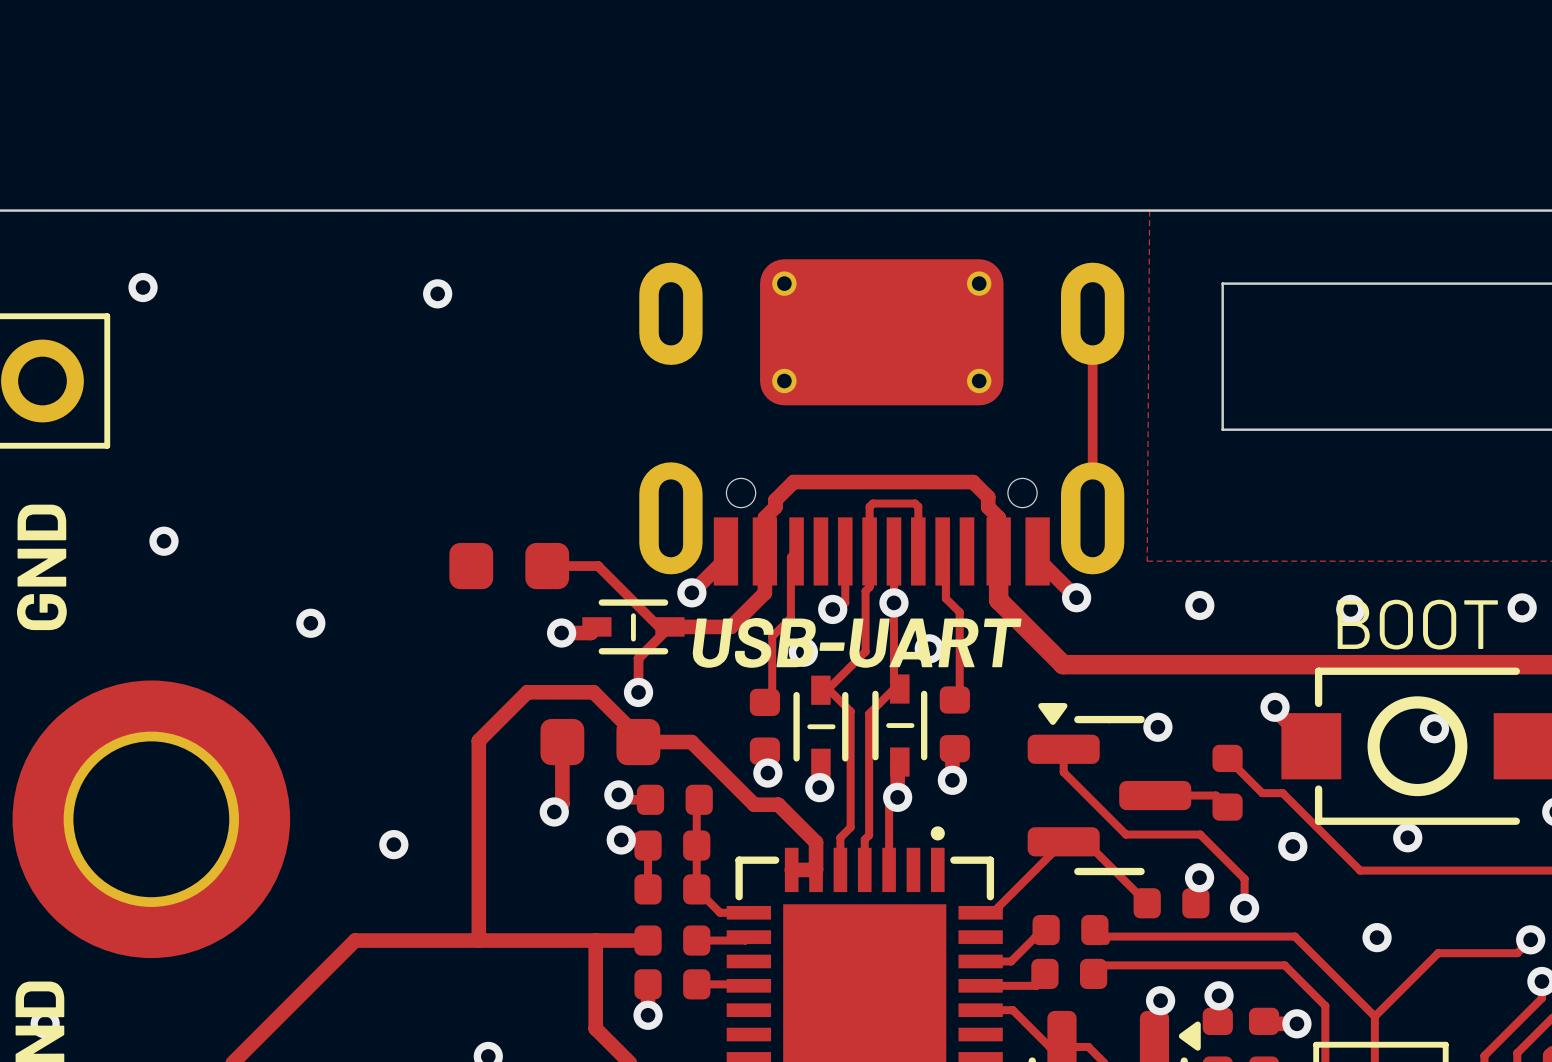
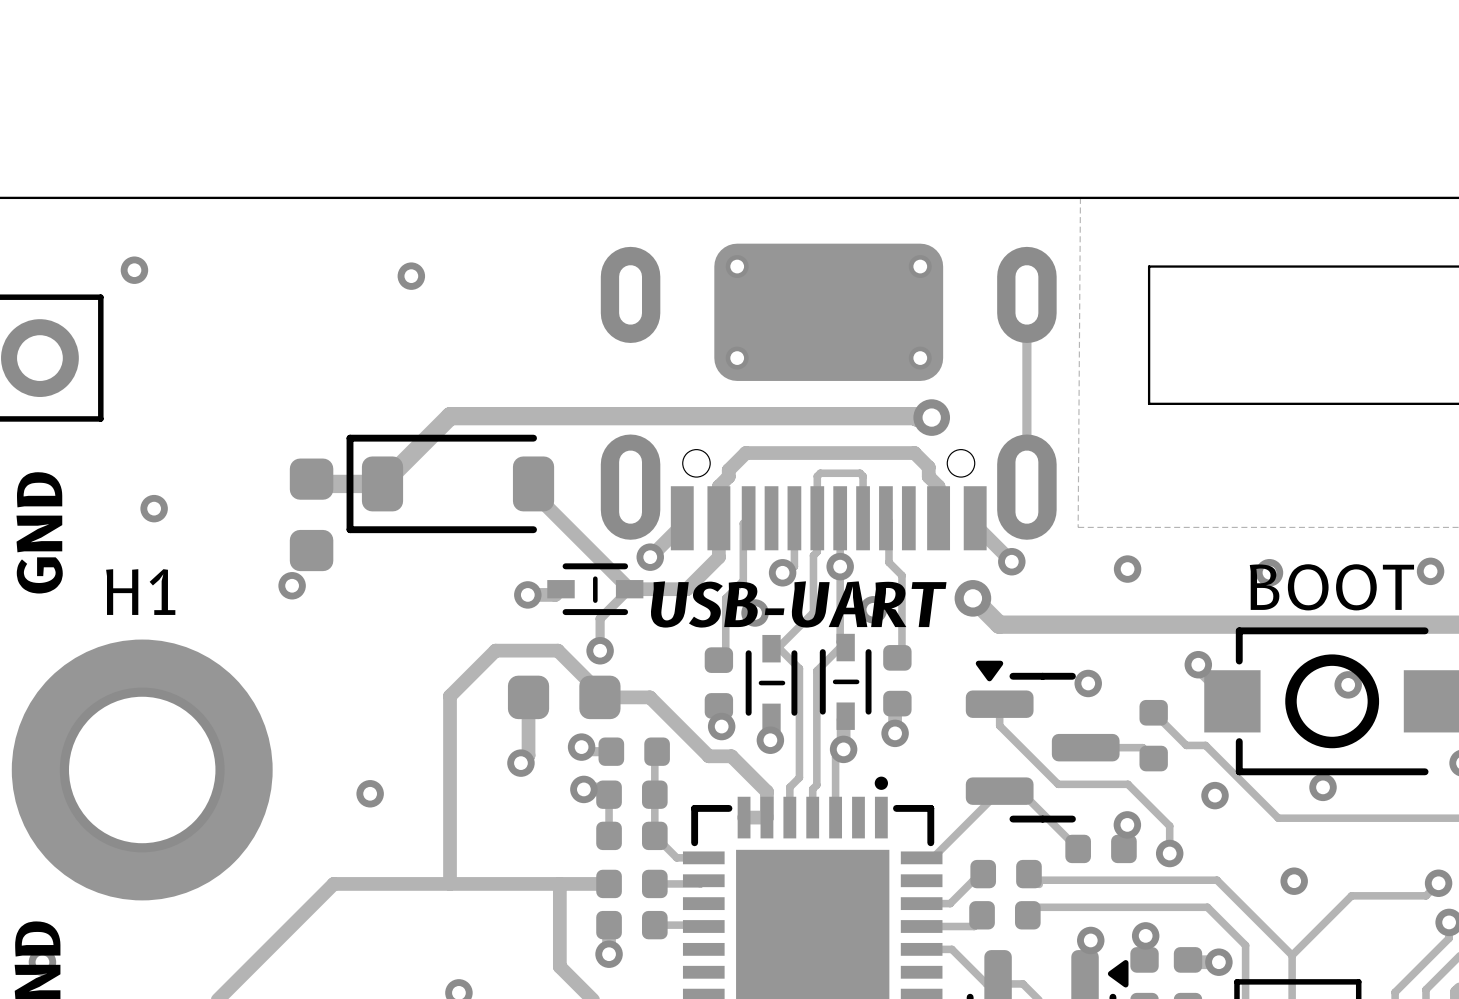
track: none -> (931, 417) (450, 416) (382, 483) (316, 483) (311, 479)
via: none -> (931, 417)
part: none -> (450, 483)
track: (998, 551) (998, 600) (1035, 636) -> none
part rotation: 0° (509, 566) -> 90° clockwise (311, 514)
part position: (509, 566) -> (311, 514)
track: (547, 566) (598, 566) (659, 626) (669, 626) -> (533, 483) (533, 493) (629, 589)
H1 name: none -> H1 (140, 592)
via: none -> (972, 598)

